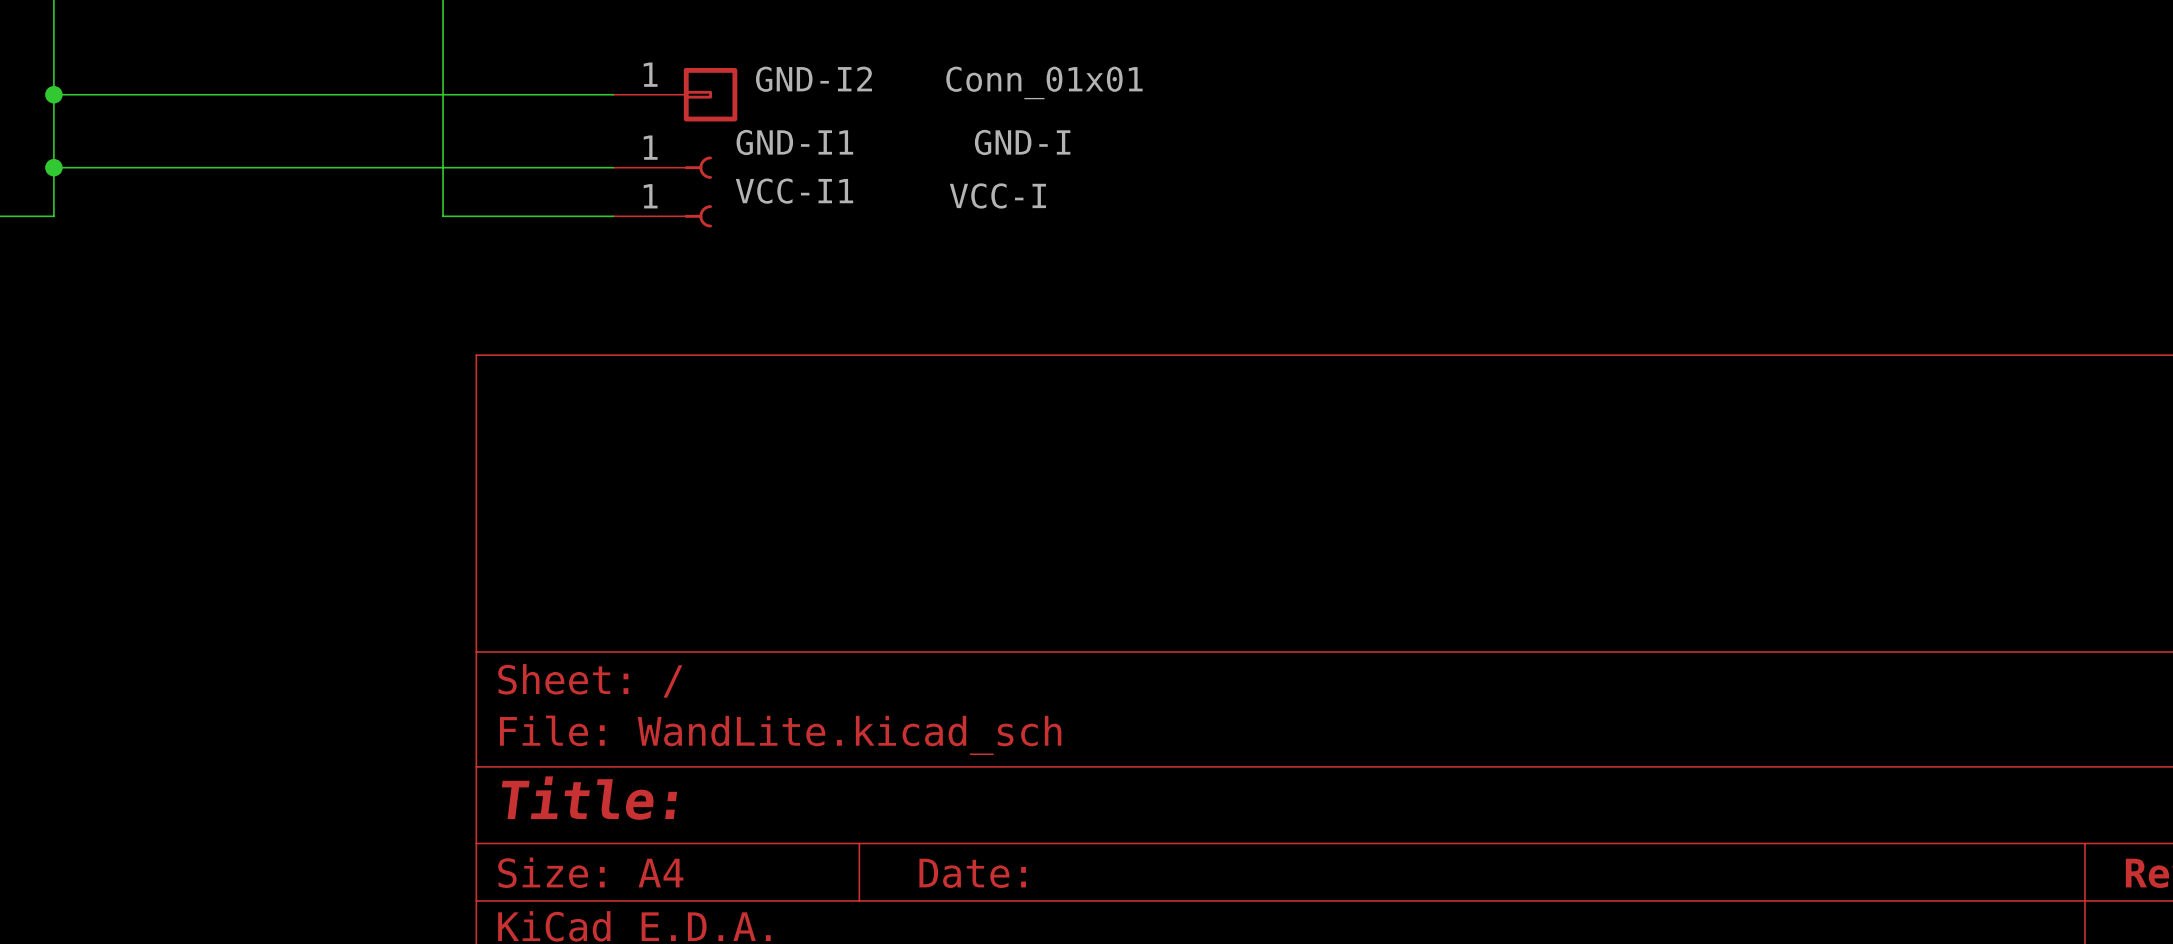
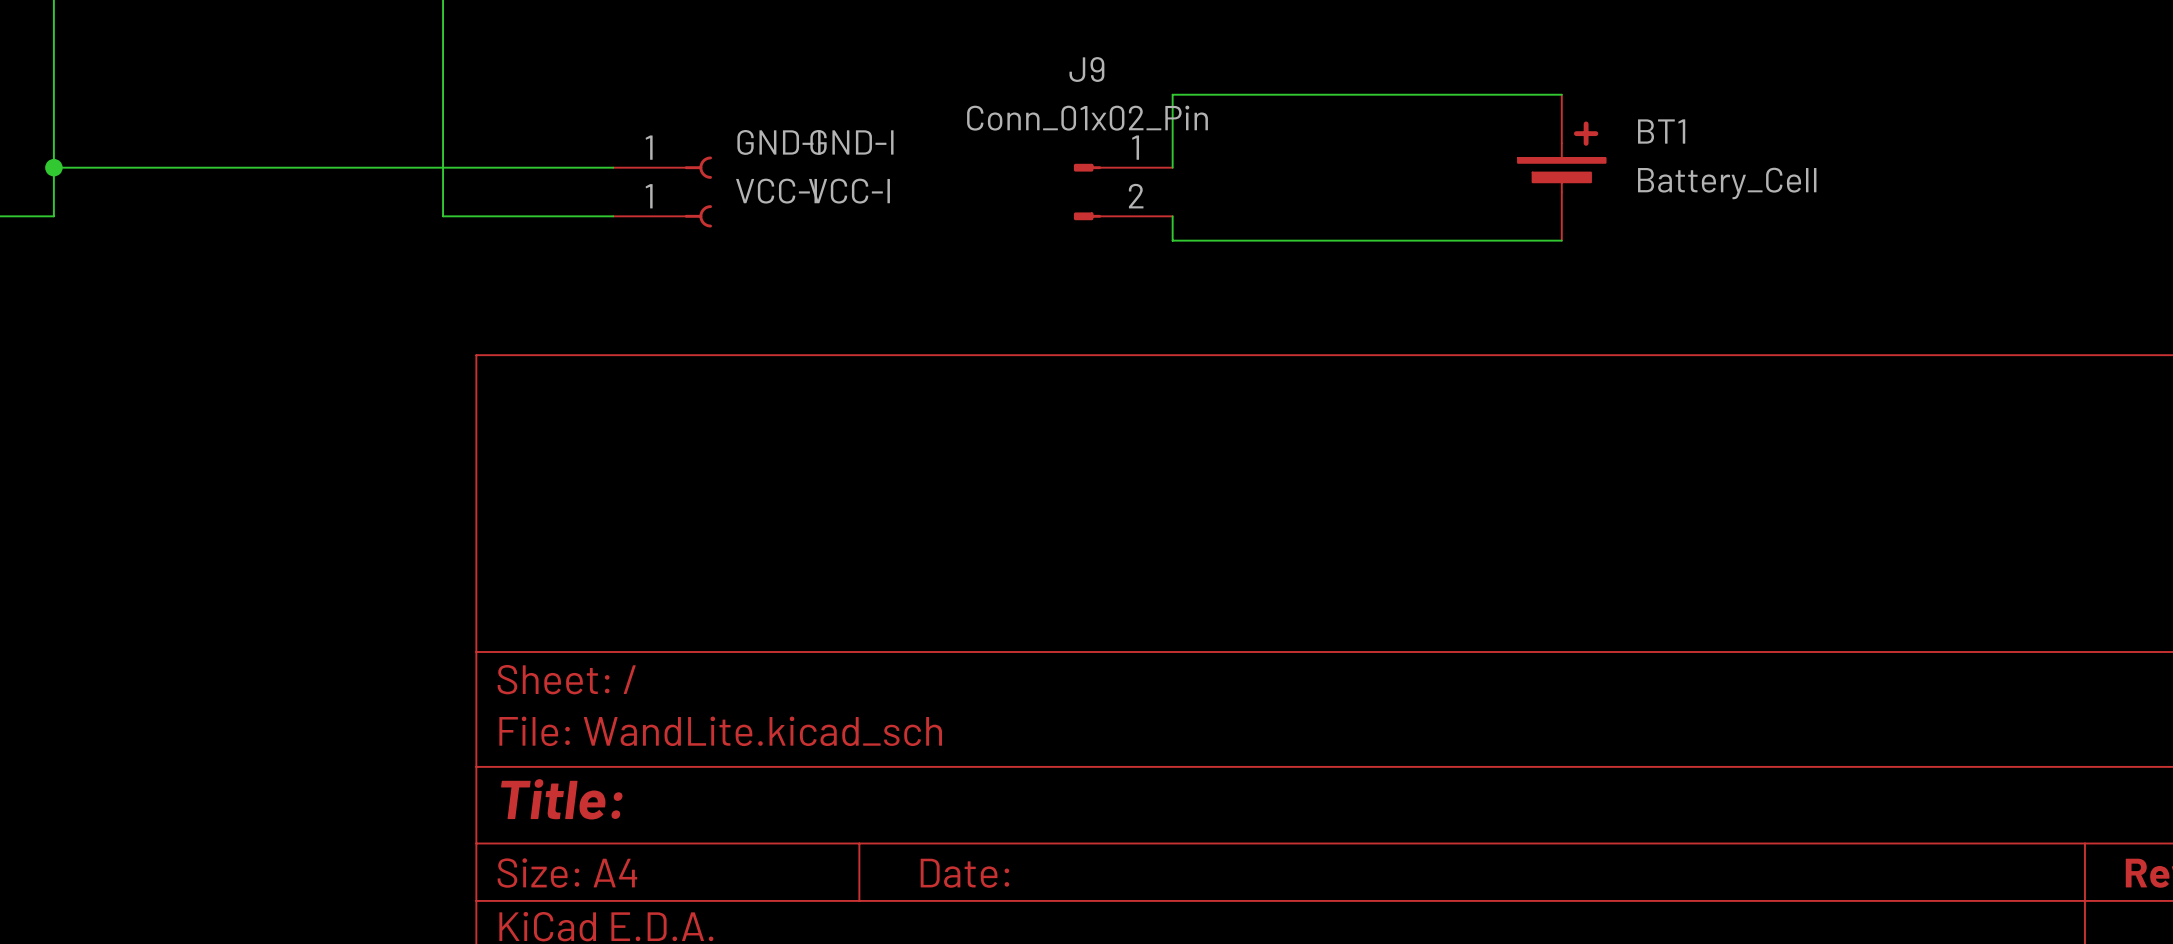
wire: (53, 94) (613, 94) -> none
junction: (53, 94) -> none
GND-I2: Conn_01x01 (675, 94) -> none
wire: none -> (1561, 94) (1172, 94) (1172, 167)
GND-I1 name: GND-I1 (794, 142) -> GND-I (778, 142)
GND-I1 value position: GND-I (1022, 142) -> GND-I (851, 142)
BT1: none -> Battery_Cell (1561, 167)
VCC-I1 name: VCC-I1 (794, 191) -> VCC-I (776, 191)
J9: none -> Conn_01x02_Pin (1123, 192)
VCC-I1 value position: VCC-I (997, 195) -> VCC-I (849, 191)
wire: none -> (1172, 216) (1172, 240) (1561, 240)

